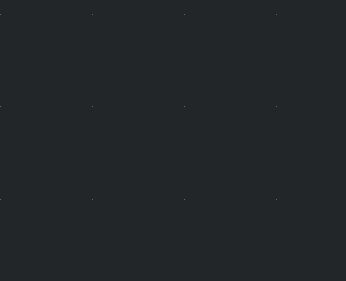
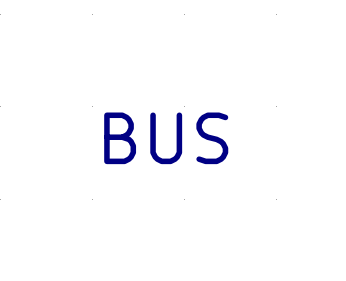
text: none -> BUS (166, 138)

